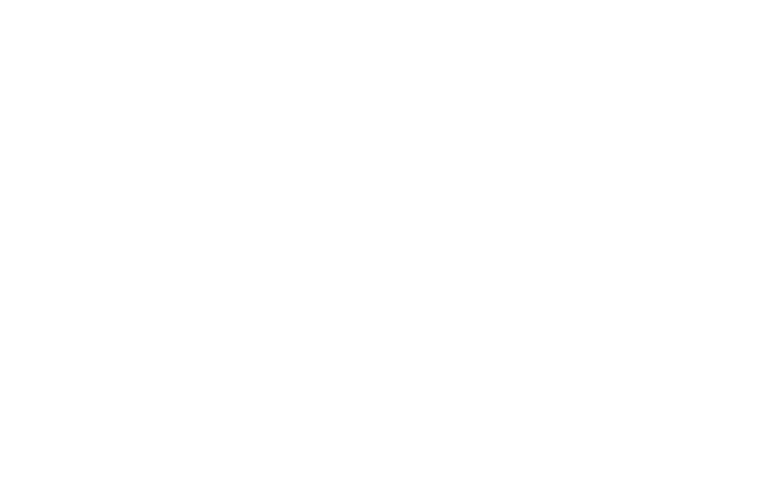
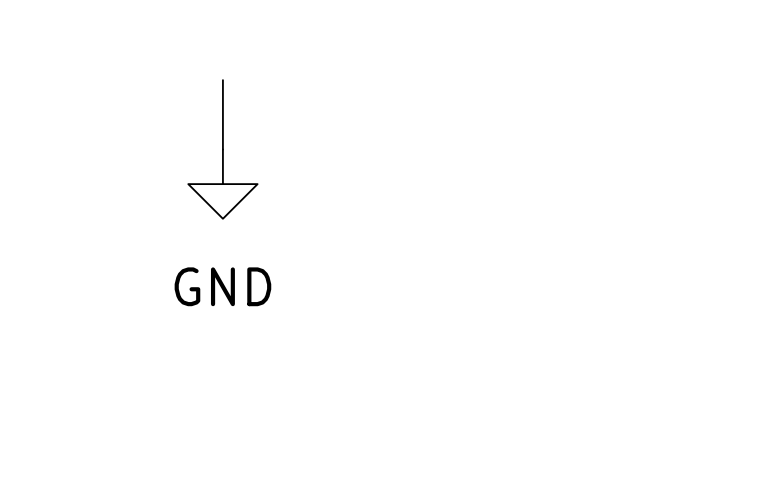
wire: none -> (222, 80) (222, 149)
power symbol: none -> GND (222, 184)

